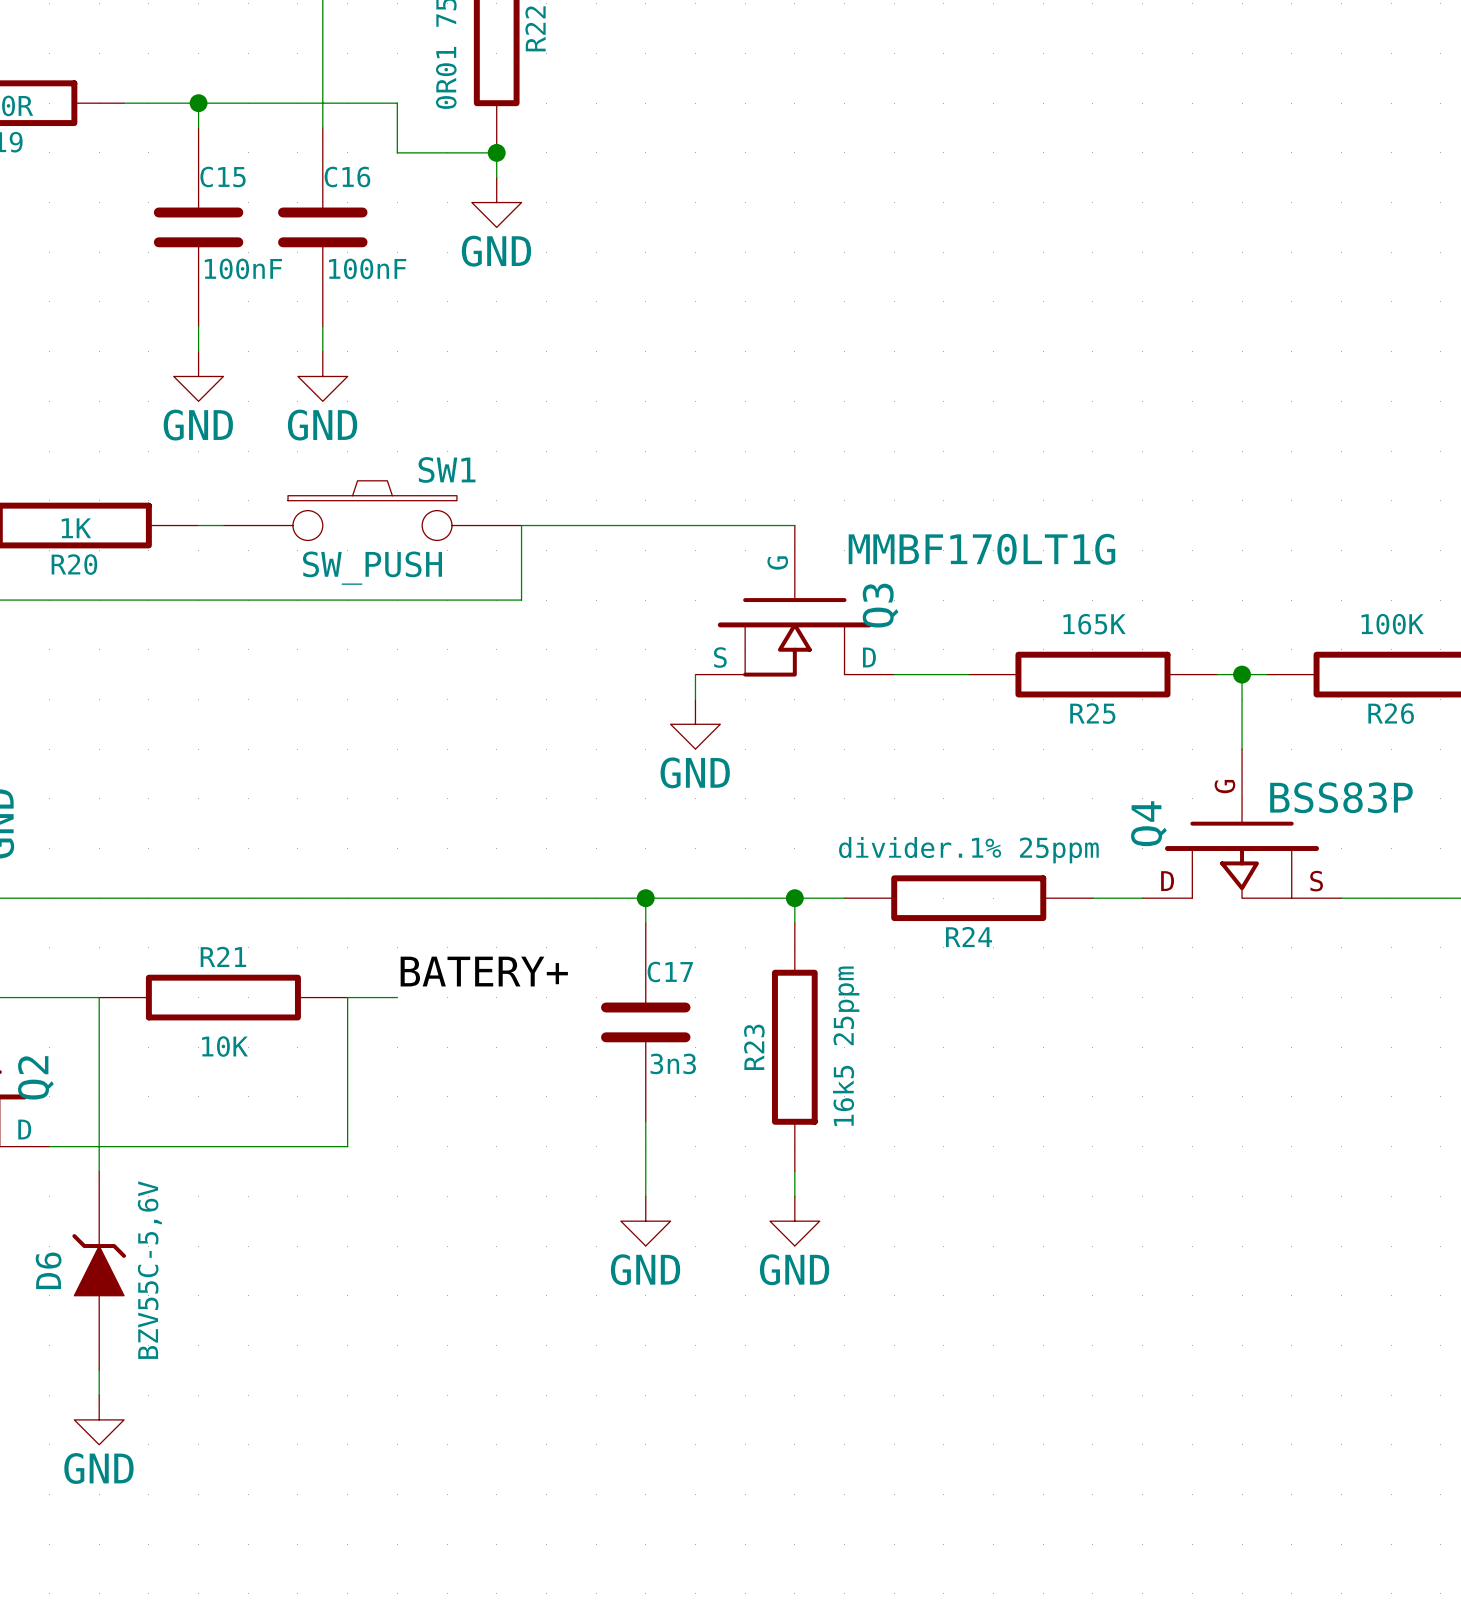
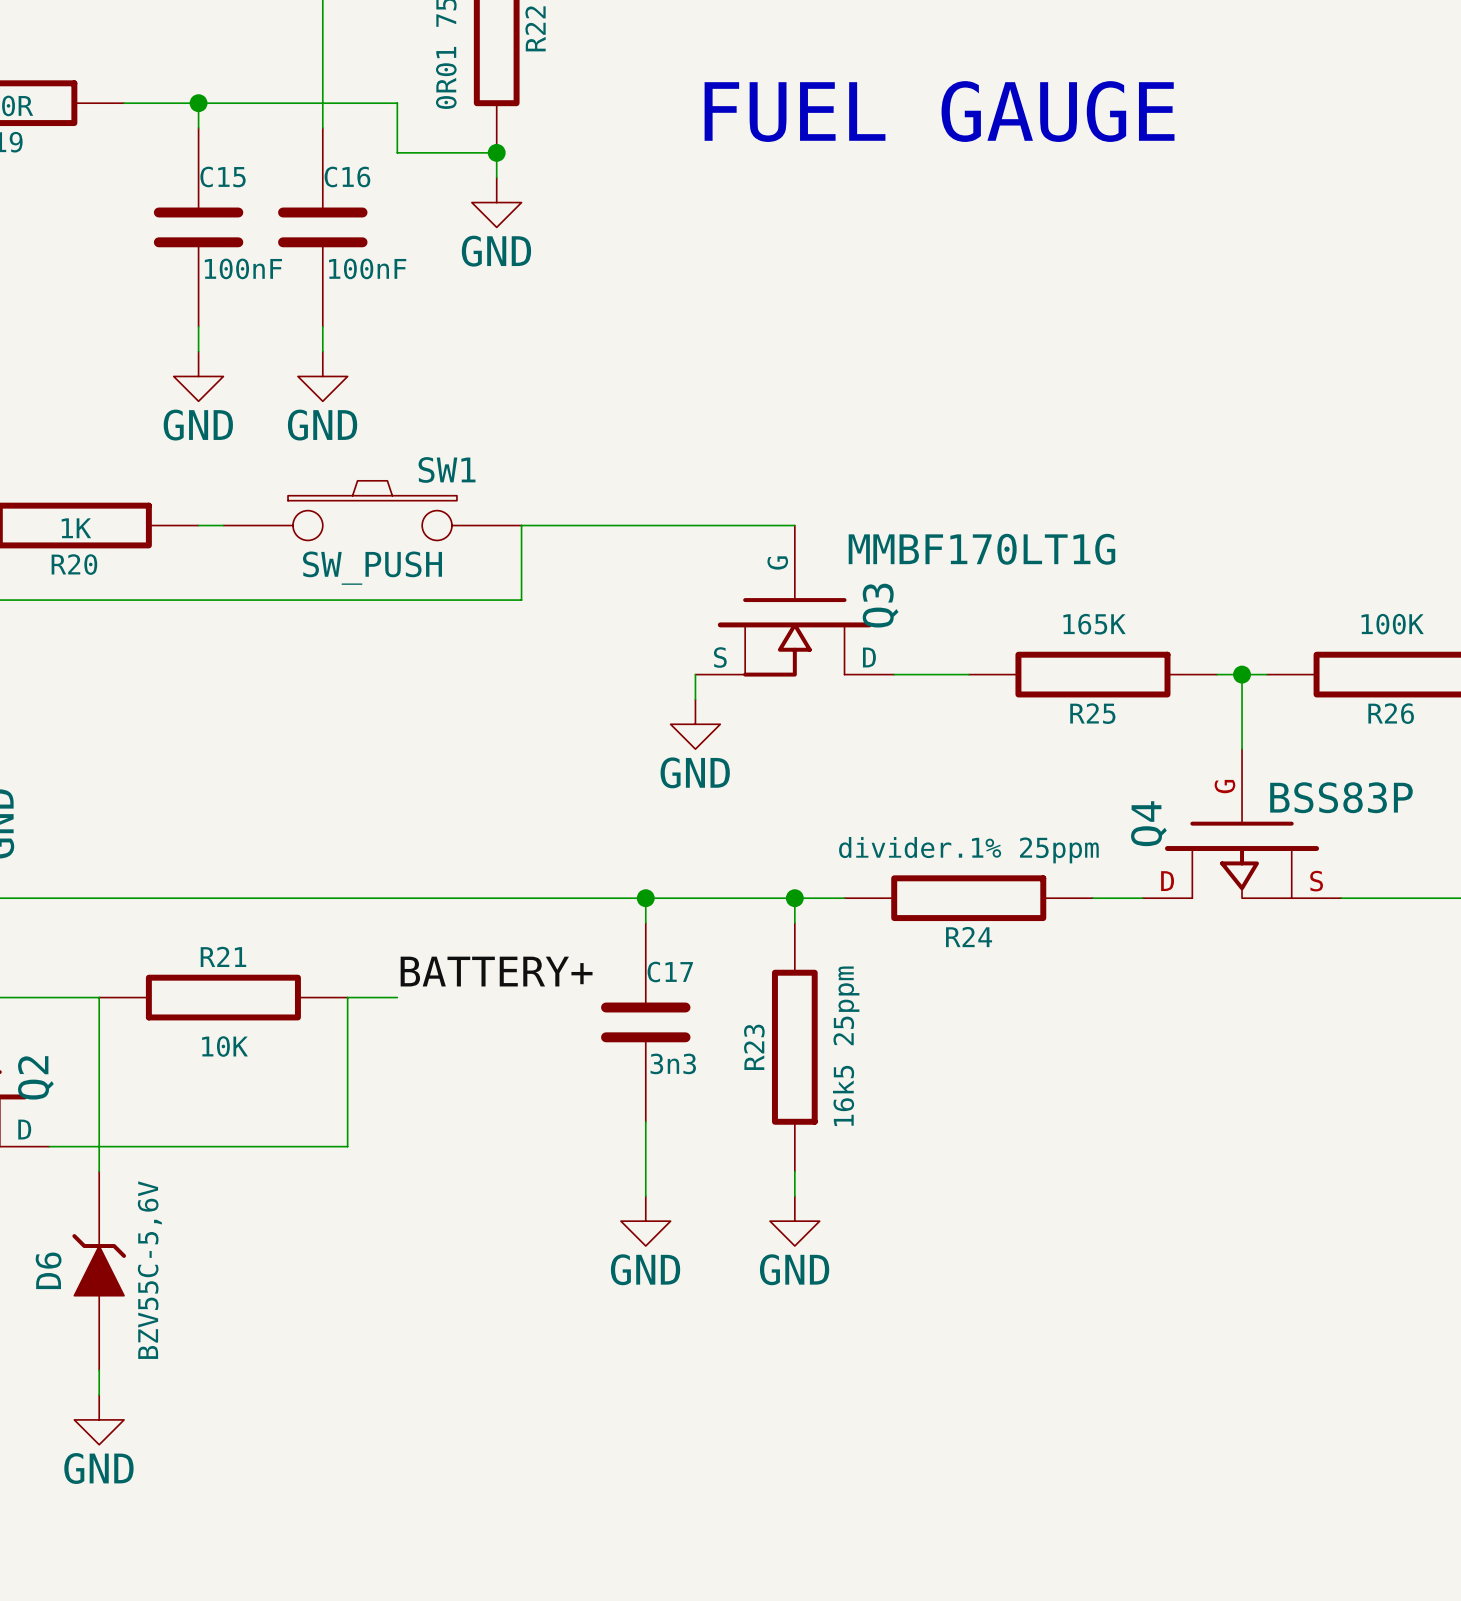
text: none -> FUEL GAUGE (939, 111)
label: BATERY+ (484, 971) -> BATTERY+ (496, 971)

